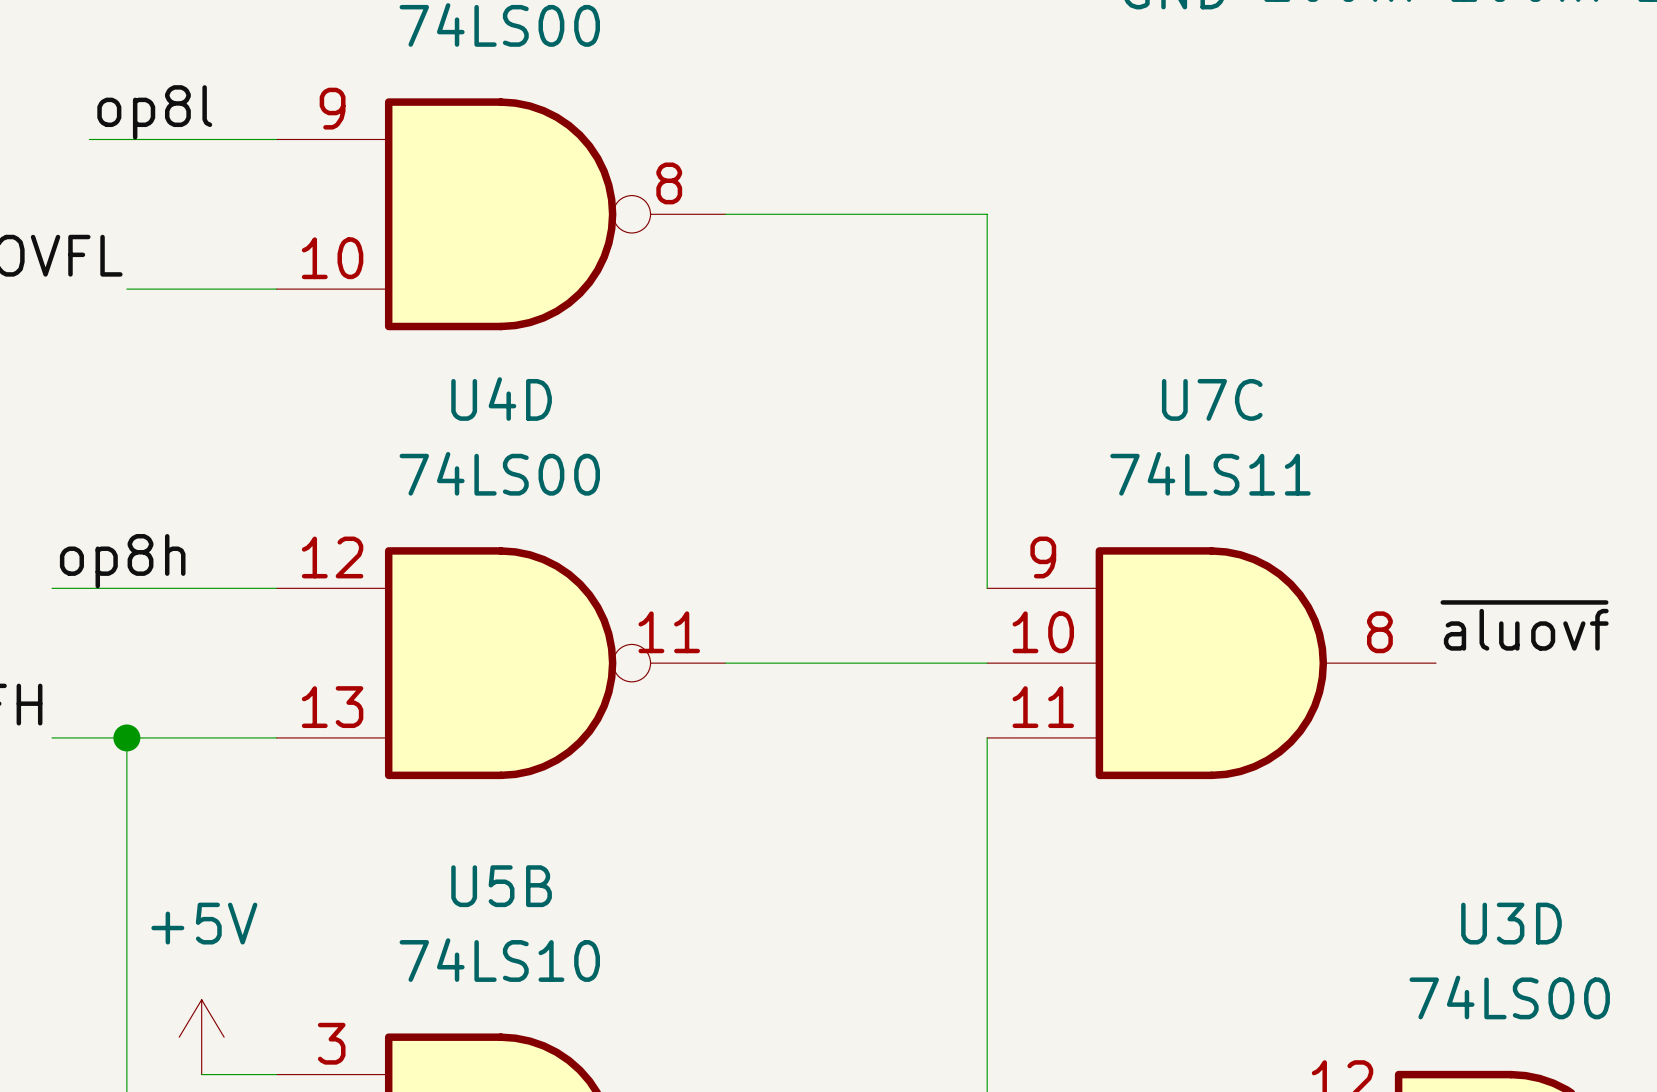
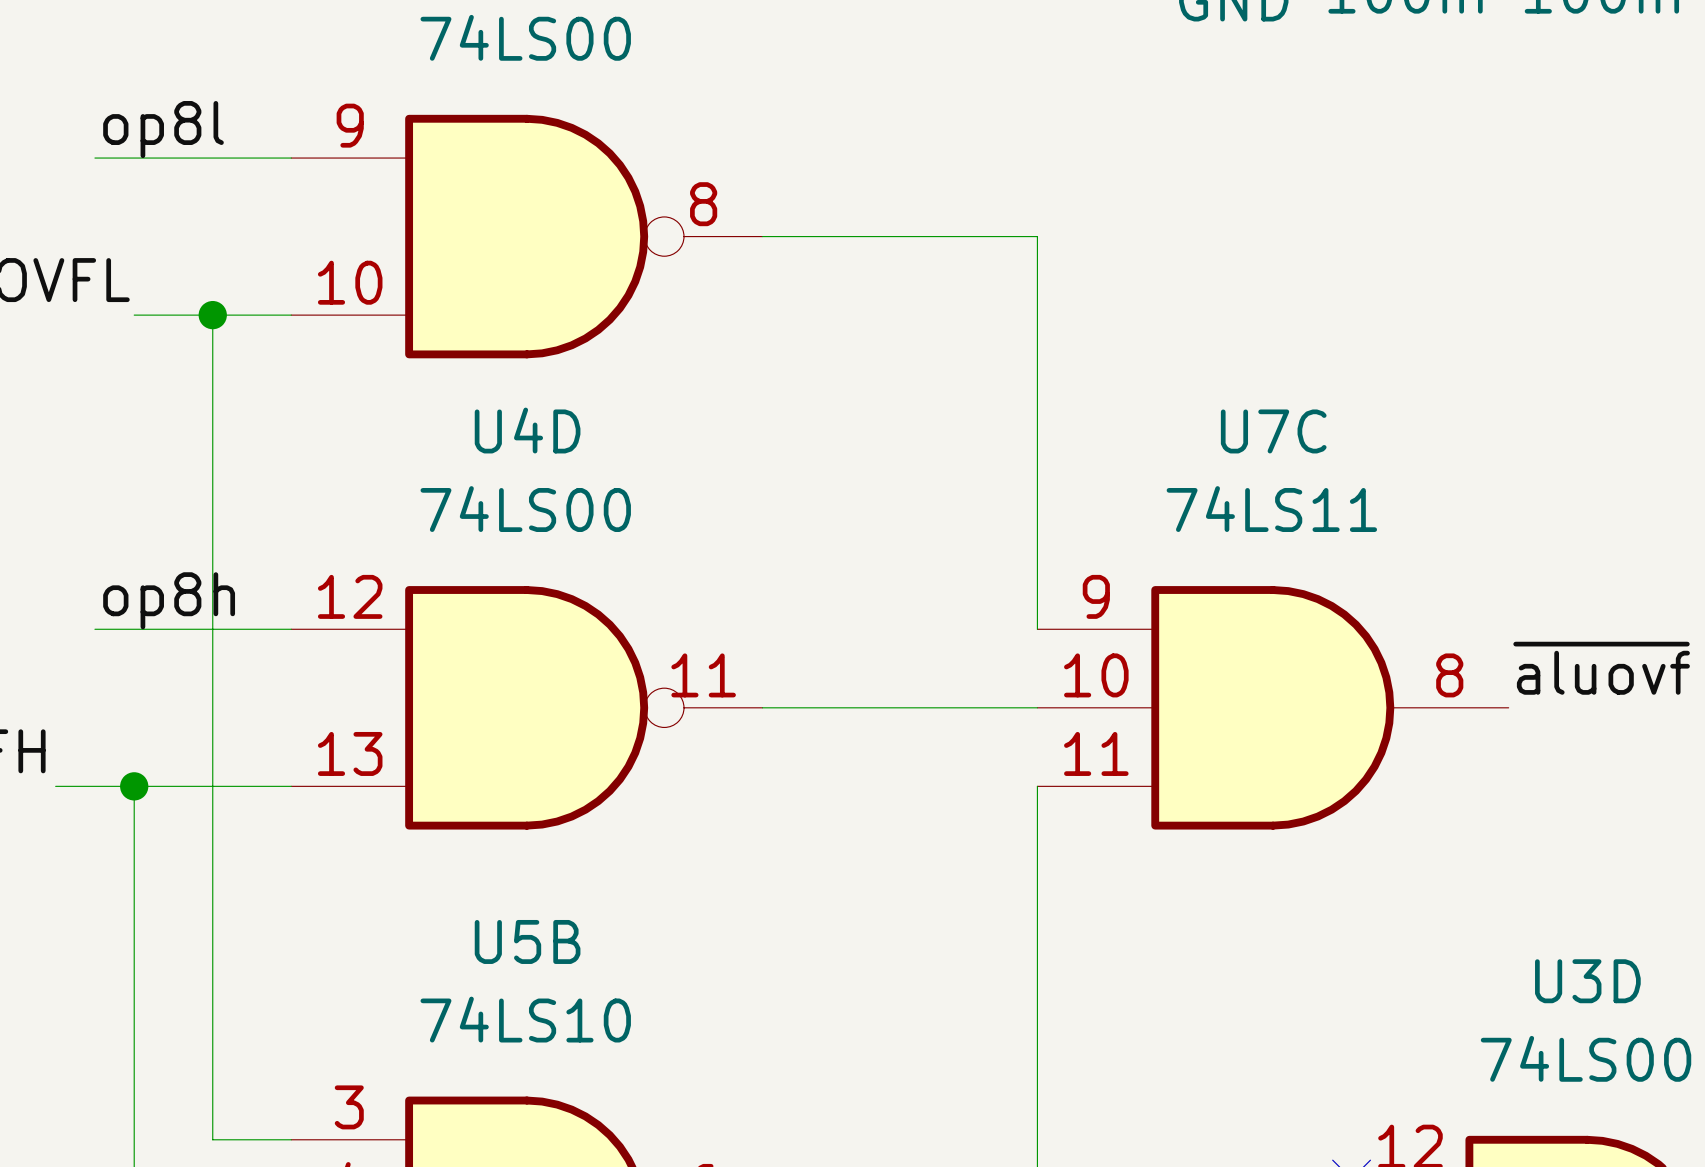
wire: none -> (212, 315) (212, 1139)
junction: none -> (212, 315)
label position: op8h (122, 561) -> op8h (169, 600)
wire: (52, 588) (89, 588) -> none
power symbol: +5V (201, 1037) -> none

